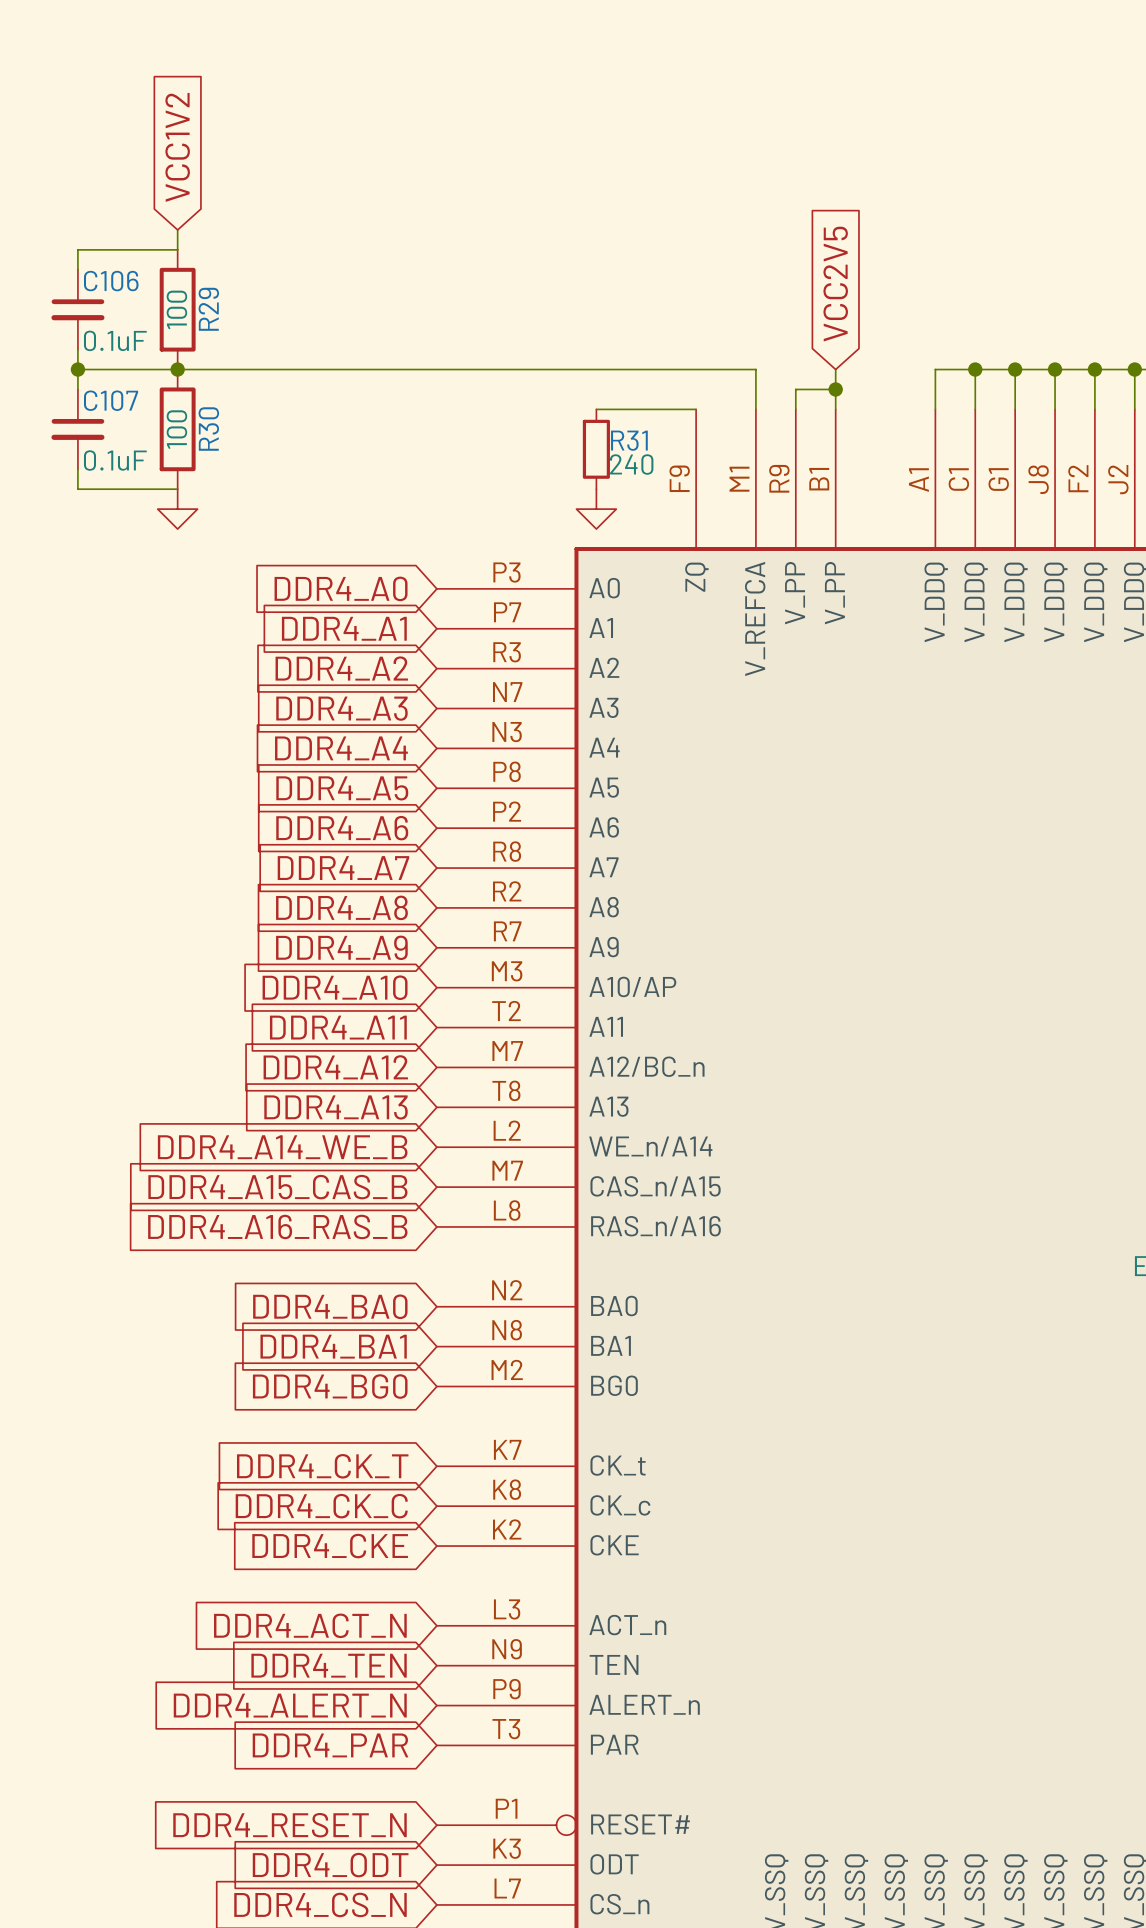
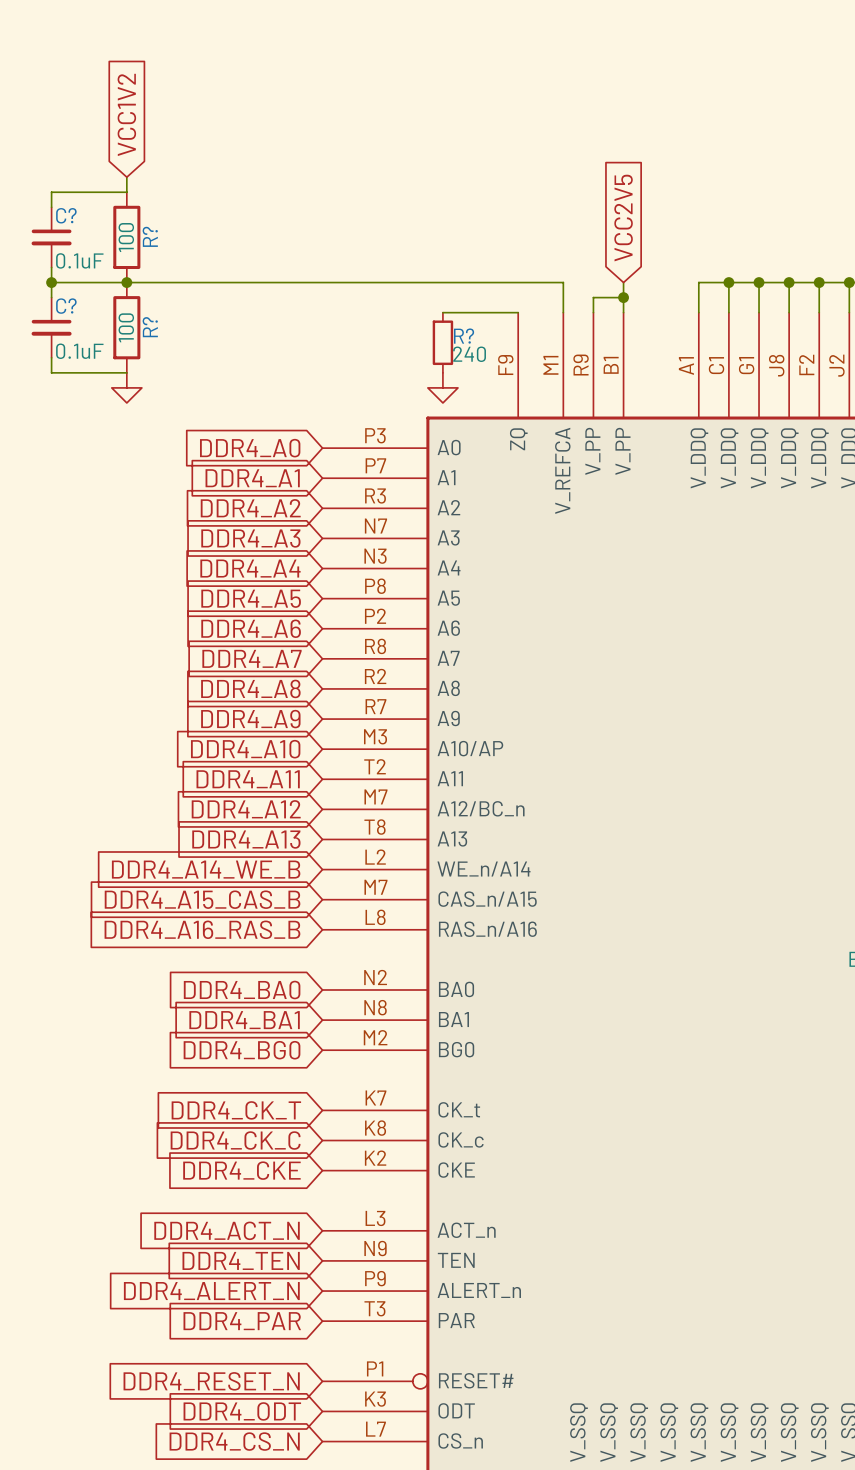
C106 name: C106 (111, 281) -> C? (66, 215)
R29 name: R29 (208, 309) -> R? (150, 236)
C107 name: C107 (111, 400) -> C? (66, 306)
R30 name: R30 (208, 429) -> R? (150, 327)
R31 name: R31 (629, 440) -> R? (464, 336)

